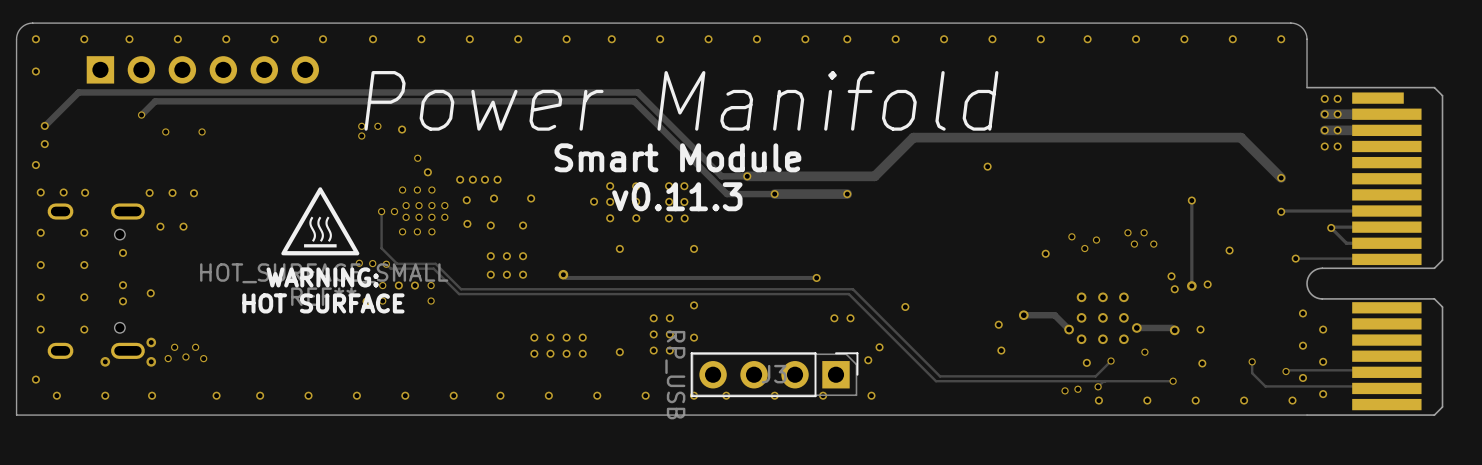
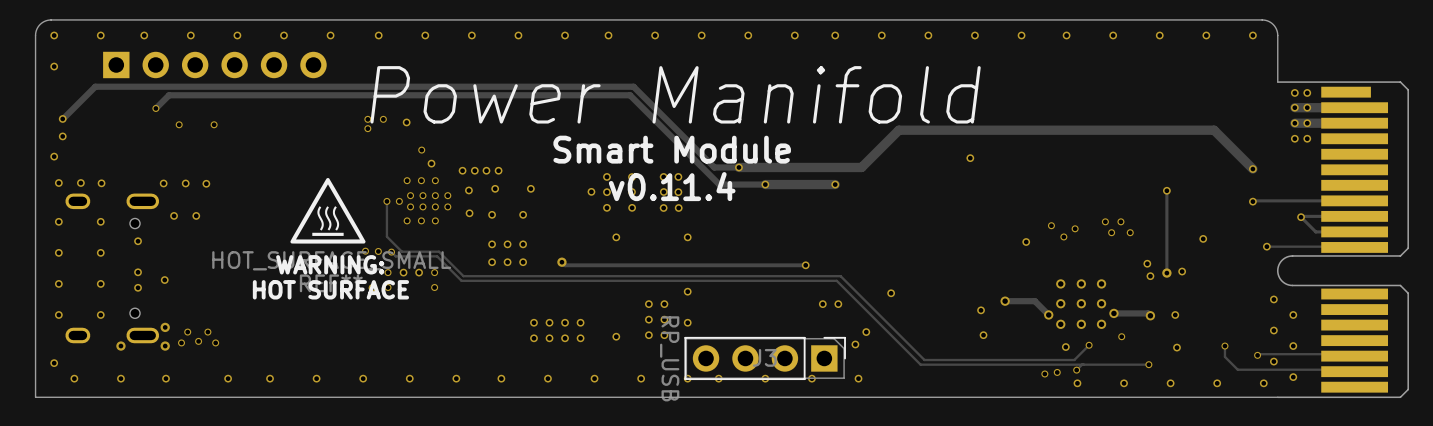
text: v0.11.3 (677, 196) -> v0.11.4 (672, 186)

